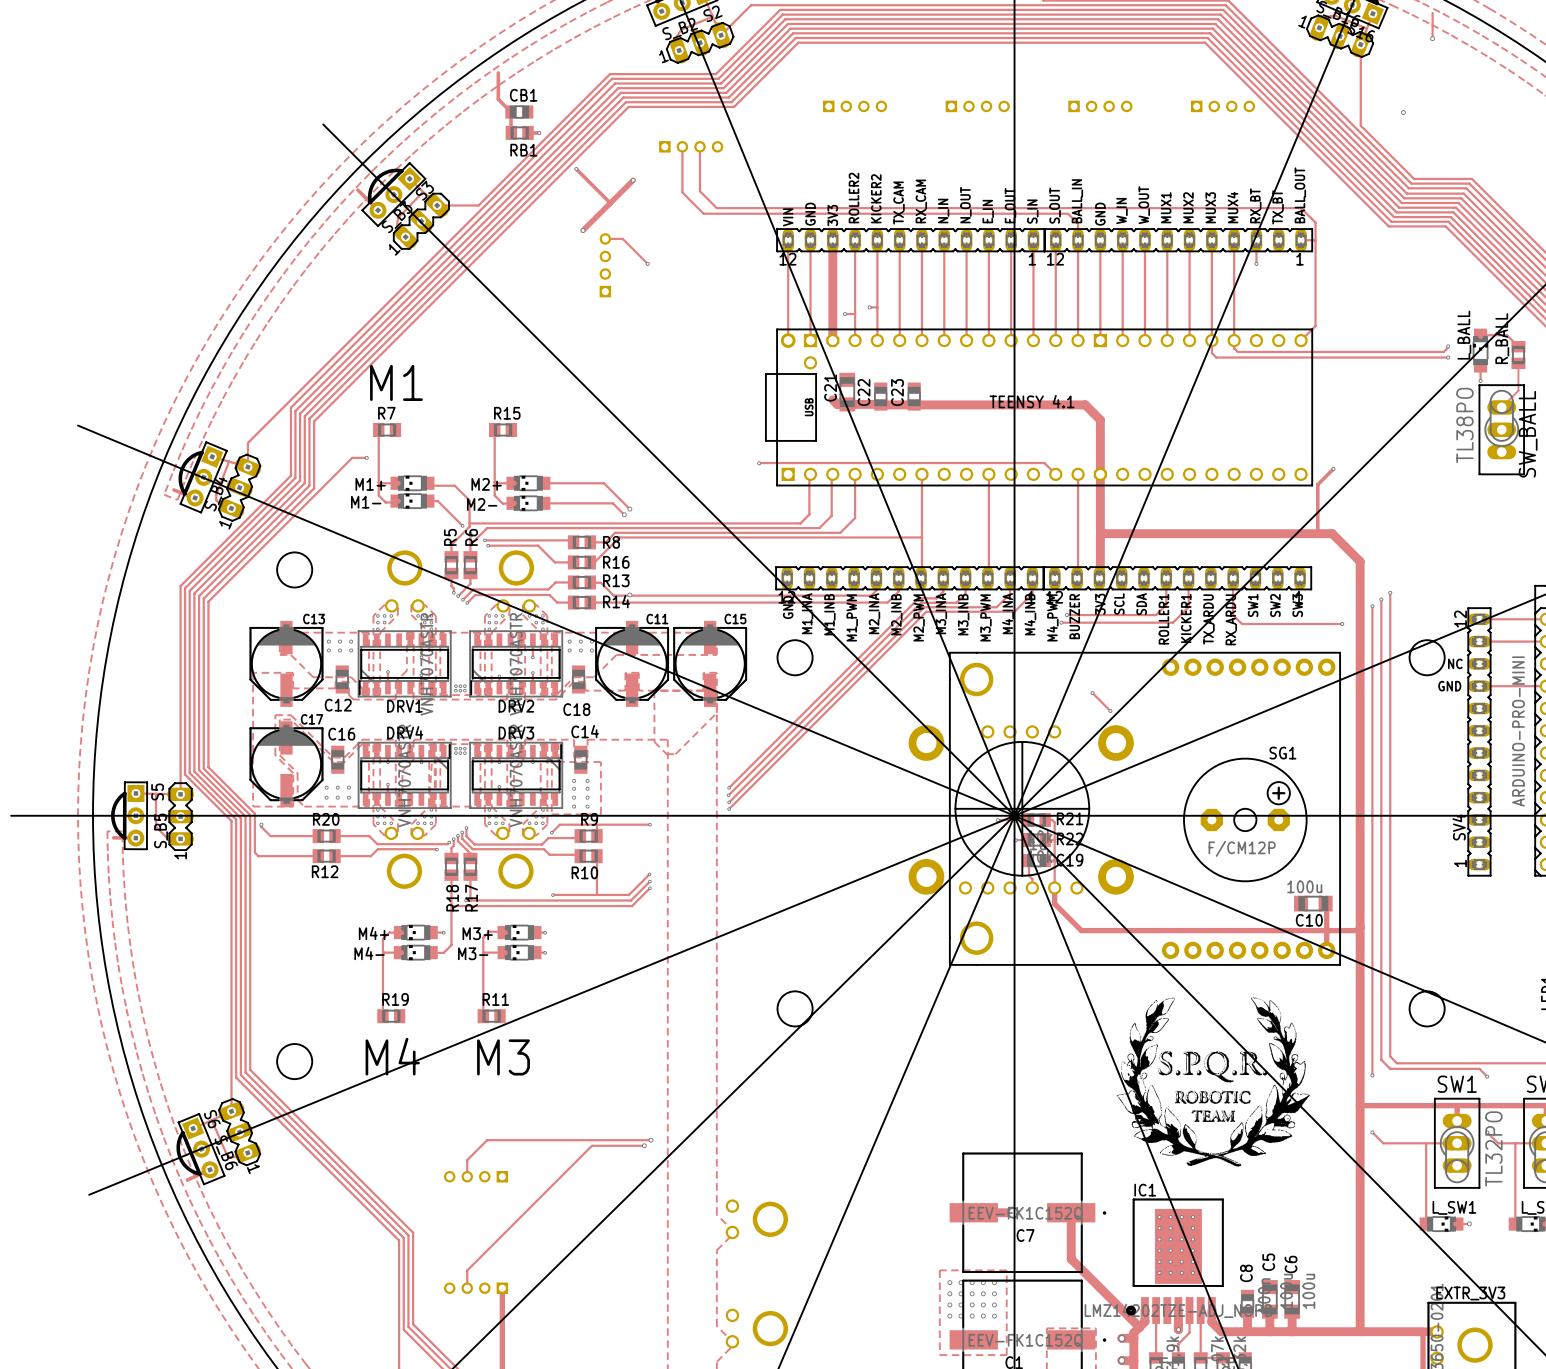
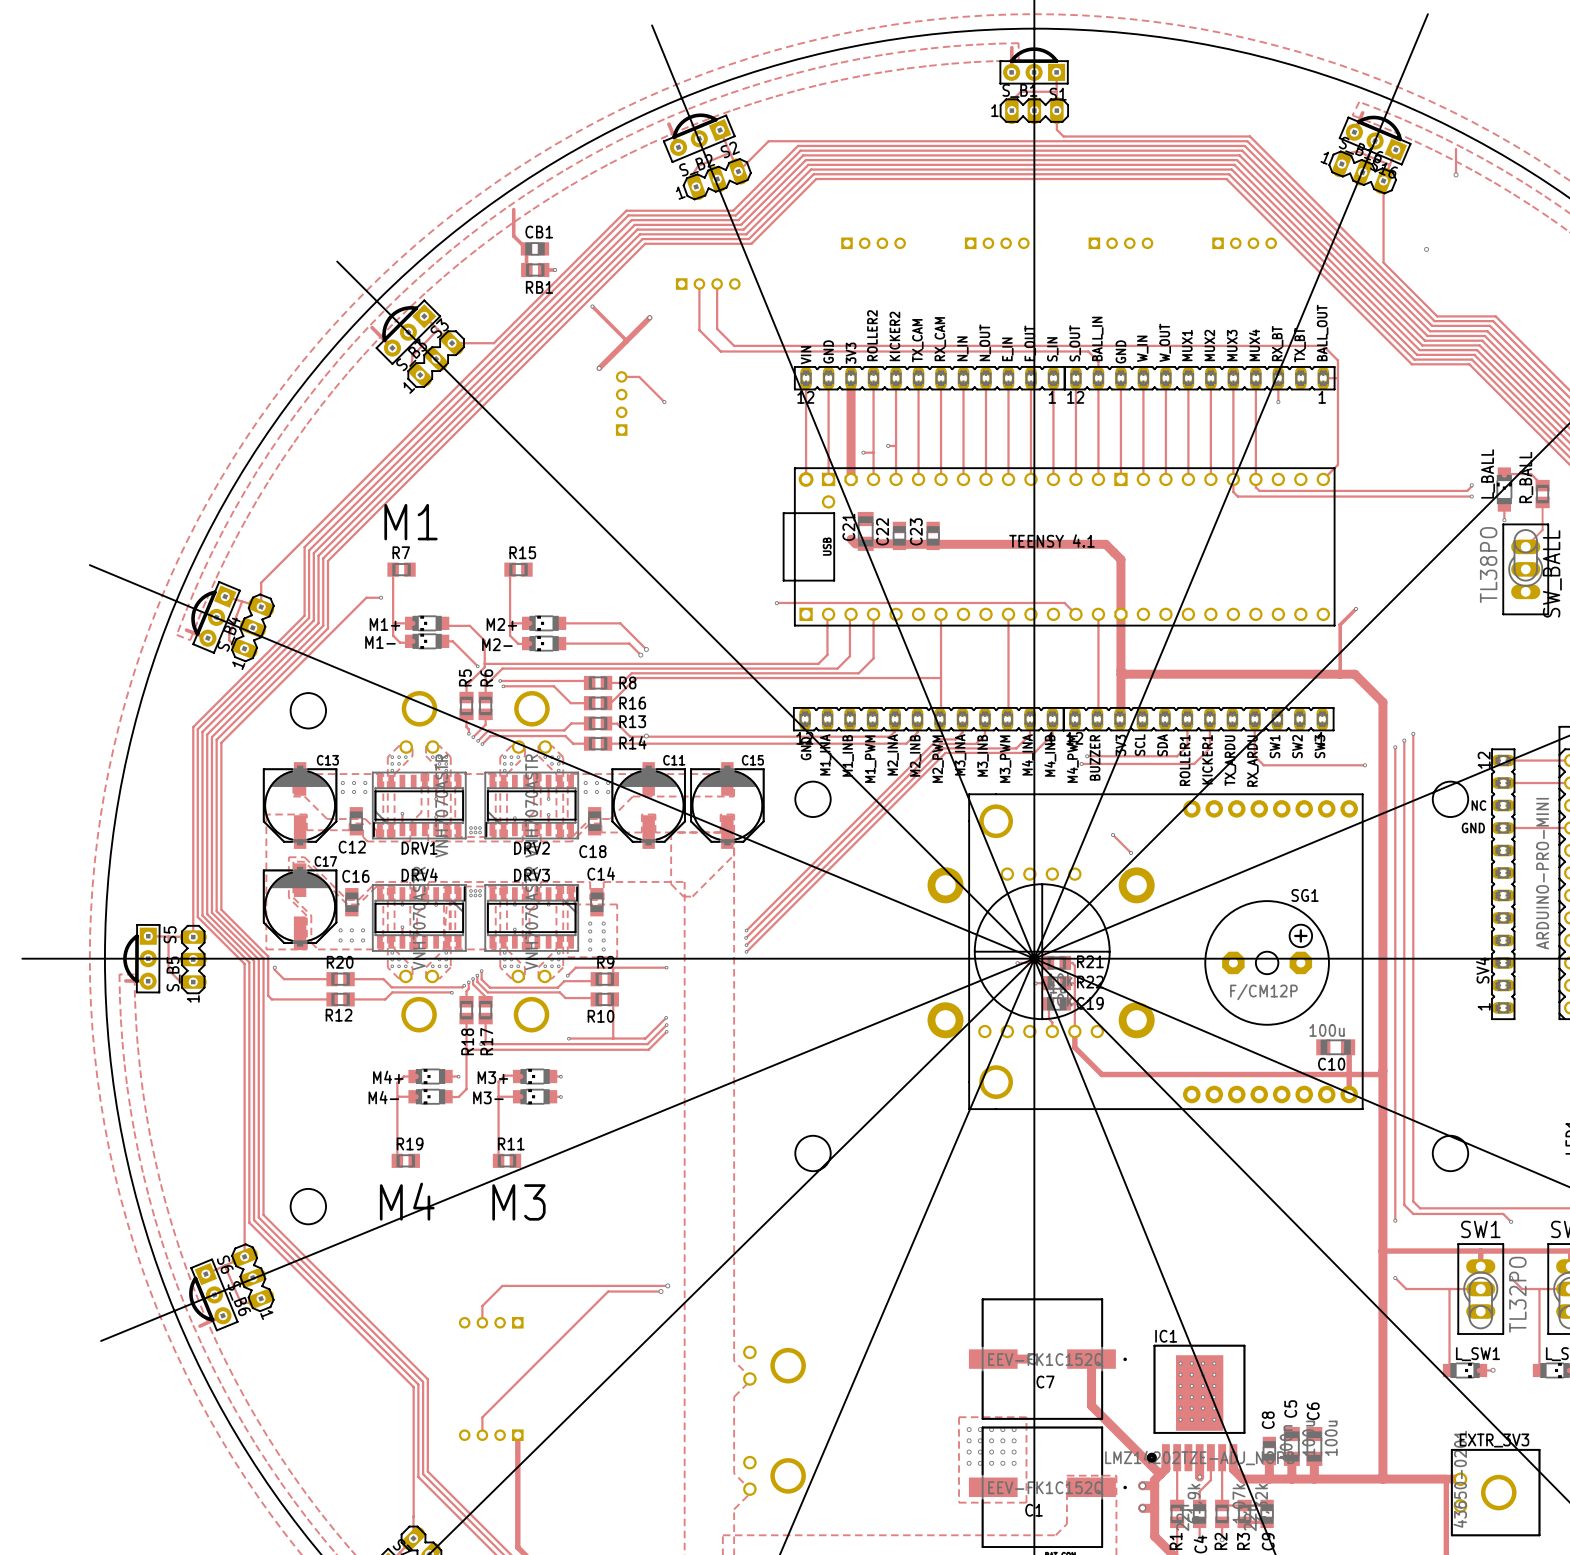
drawing: [1116, 997, 1310, 1167] -> none

